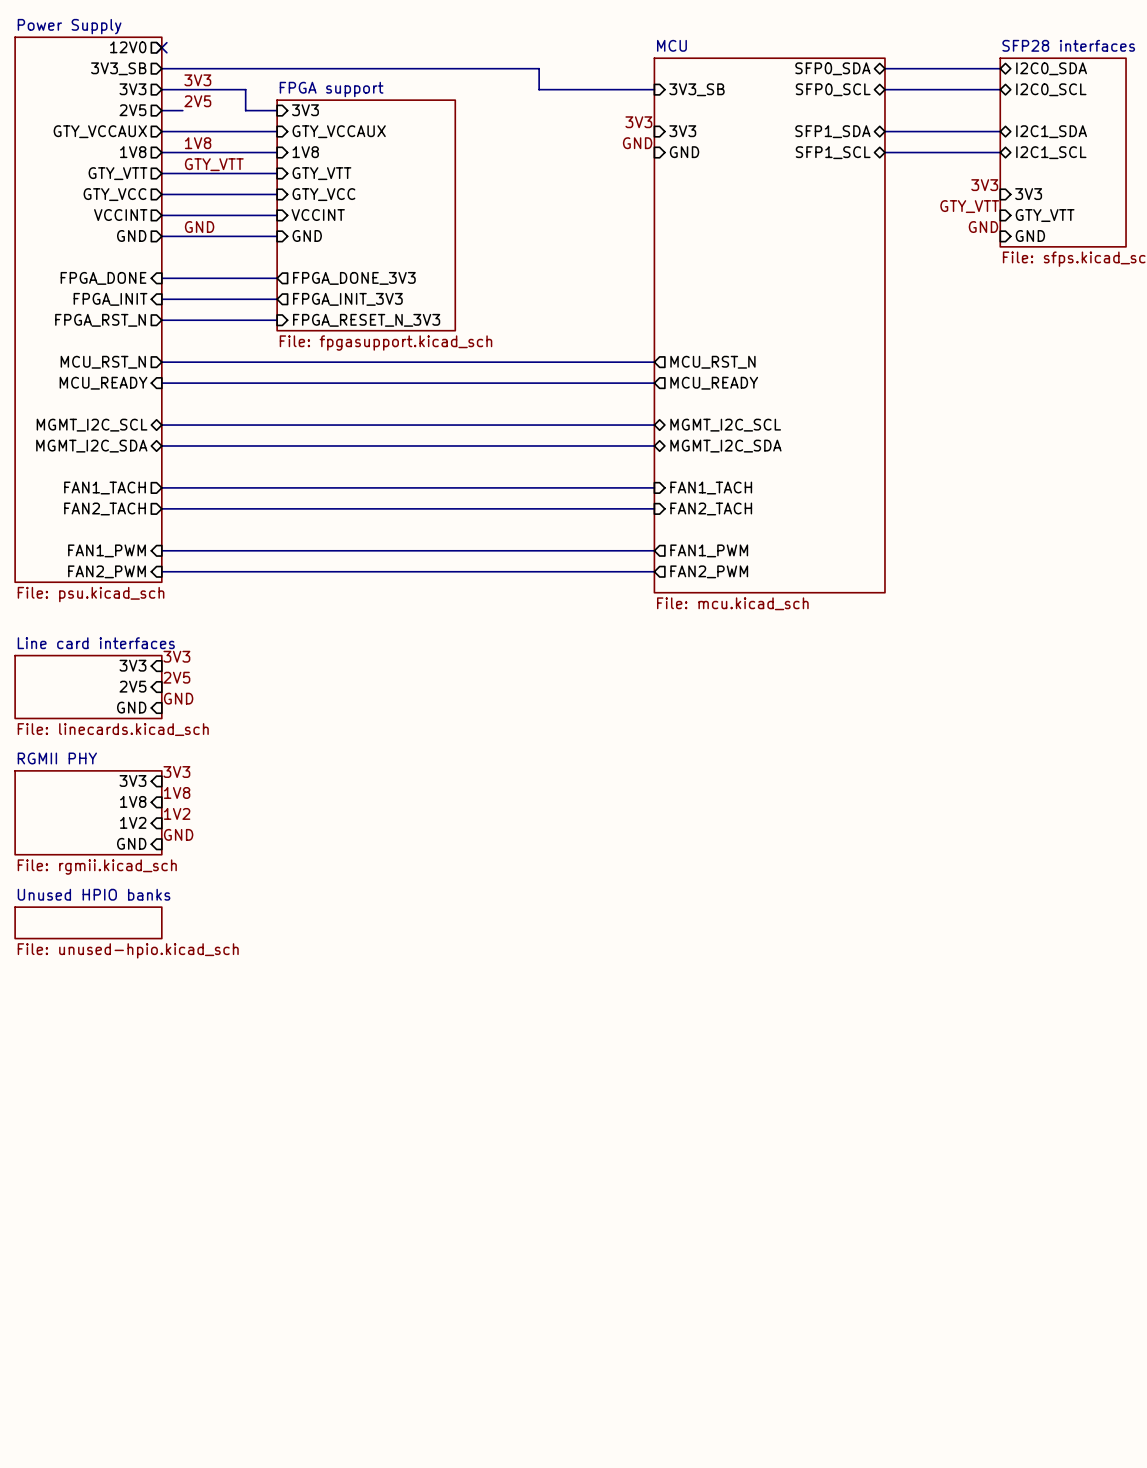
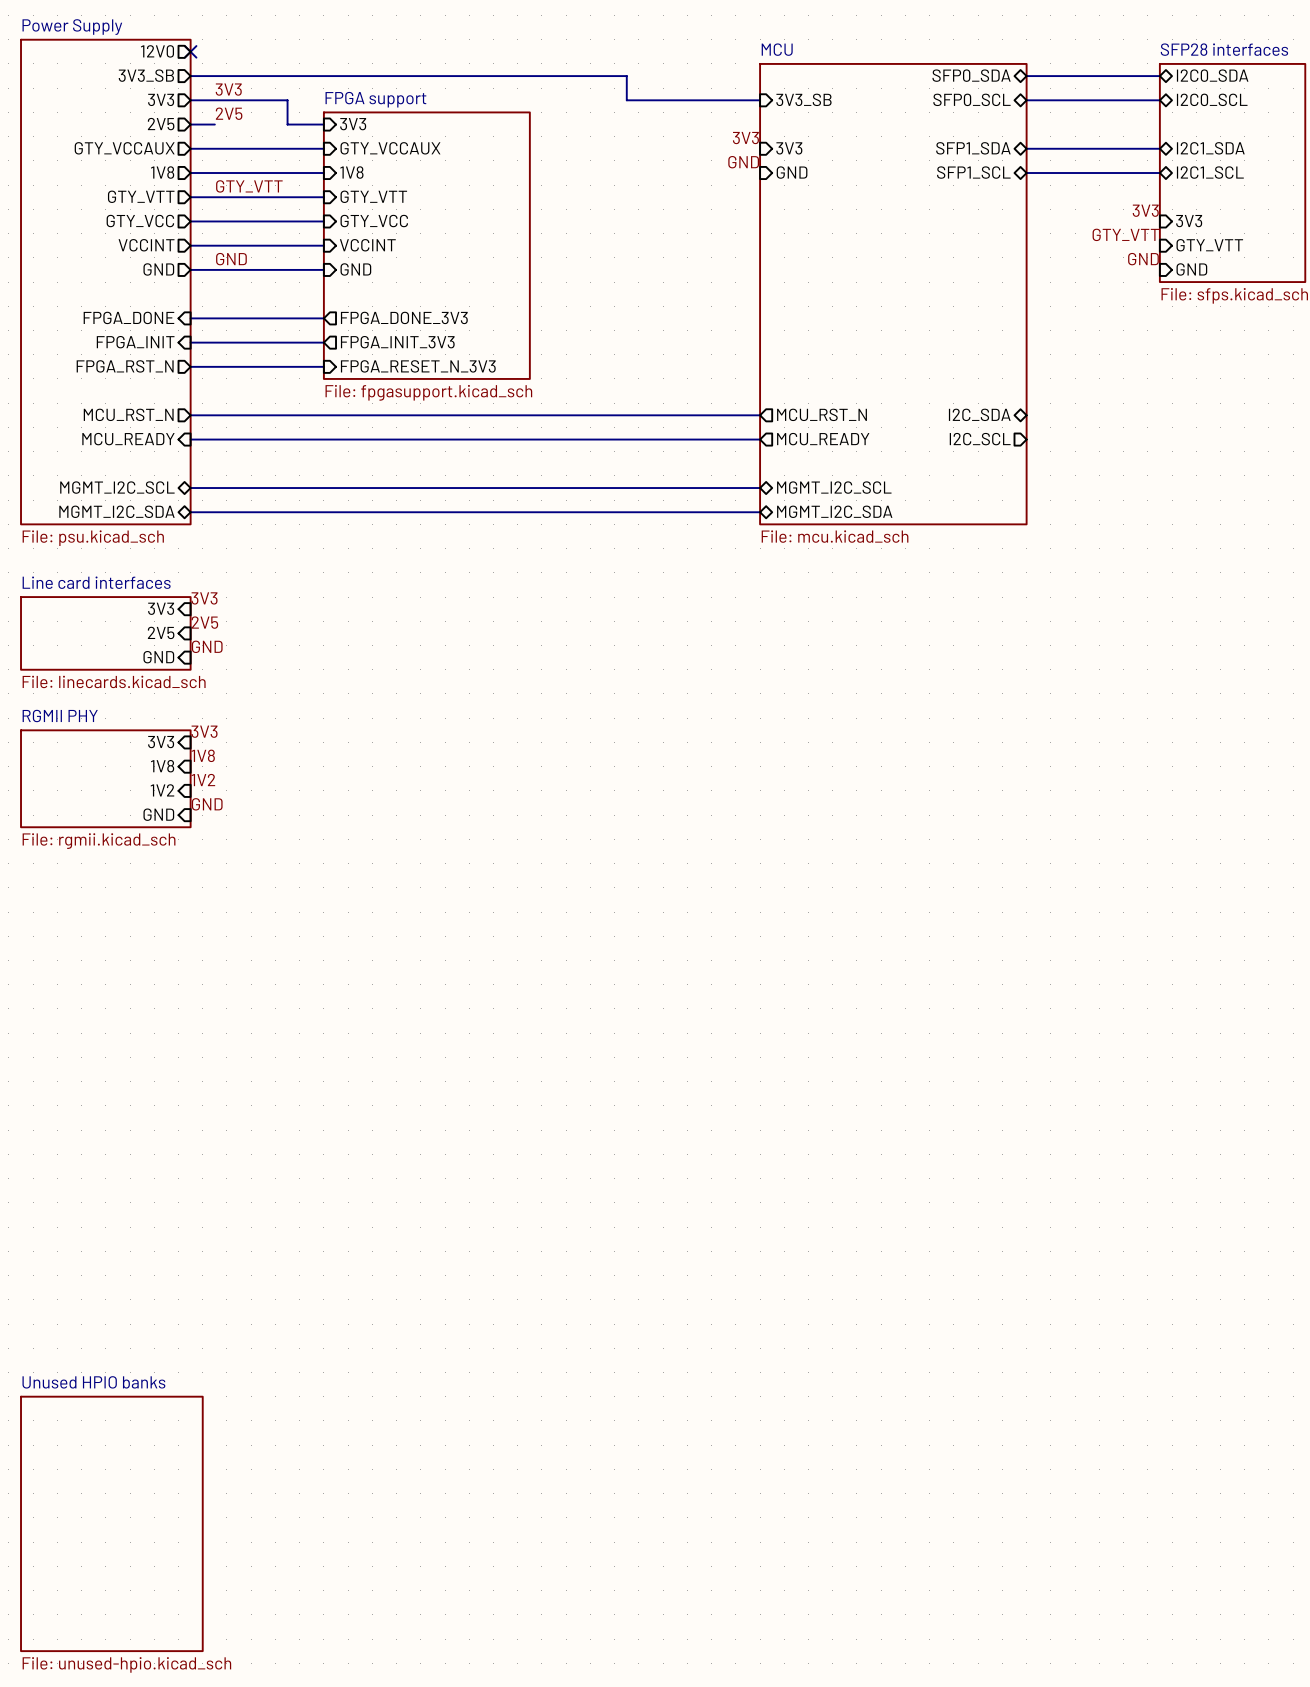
label: 1V8 (198, 143) -> none
sheet Power Supply: none -> File: psu.kicad_sch (105, 282)
sheet MCU: none -> File: mcu.kicad_sch (893, 294)
sheet Power Supply: File: psu.kicad_sch (88, 309) -> none
sheet MCU: File: mcu.kicad_sch (769, 325) -> none
sheet pin: none -> I2C_SDA (979, 414)
sheet pin: none -> I2C_SCL (980, 439)
wire: (161, 487) (654, 487) -> none
sheet pin: FAN1_TACH (105, 488) -> none
sheet pin: FAN1_TACH (711, 488) -> none
sheet pin: FAN2_TACH (105, 508) -> none
wire: (161, 508) (654, 508) -> none
sheet pin: FAN2_TACH (711, 508) -> none
label: none -> 3V3 (204, 598)
sheet pin: none -> 3V3 (161, 608)
label: none -> 2V5 (204, 622)
sheet pin: FAN1_PWM (107, 550) -> 2V5 (161, 632)
wire: (161, 550) (654, 550) -> none
sheet pin: FAN1_PWM (709, 550) -> none
label: none -> GND (207, 646)
sheet pin: FAN2_PWM (107, 571) -> GND (158, 657)
wire: (161, 571) (654, 571) -> none
sheet pin: FAN2_PWM (709, 571) -> none
label: none -> 3V3 (204, 731)
sheet pin: none -> 3V3 (161, 742)
label: 3V3 (176, 656) -> 1V8 (203, 755)
sheet pin: 3V3 (132, 665) -> 1V8 (162, 766)
label: 2V5 (176, 677) -> 1V2 (203, 780)
sheet pin: 2V5 (132, 686) -> 1V2 (162, 790)
sheet Line card interfaces position: (88, 687) -> (105, 633)
label: 3V3 (176, 772) -> none
sheet pin: 3V3 (132, 780) -> none
label: 1V8 (177, 792) -> none
sheet pin: 1V8 (133, 801) -> none
sheet RGMII PHY position: (88, 812) -> (105, 778)
label: 1V2 (177, 813) -> none
sheet pin: 1V2 (133, 822) -> none
label: GND (178, 834) -> none
sheet pin: GND (131, 843) -> none
sheet Unused HPIO banks: File: unused-hpio.kicad_sch (88, 922) -> none
sheet Unused HPIO banks: none -> File: unused-hpio.kicad_sch (111, 1523)

